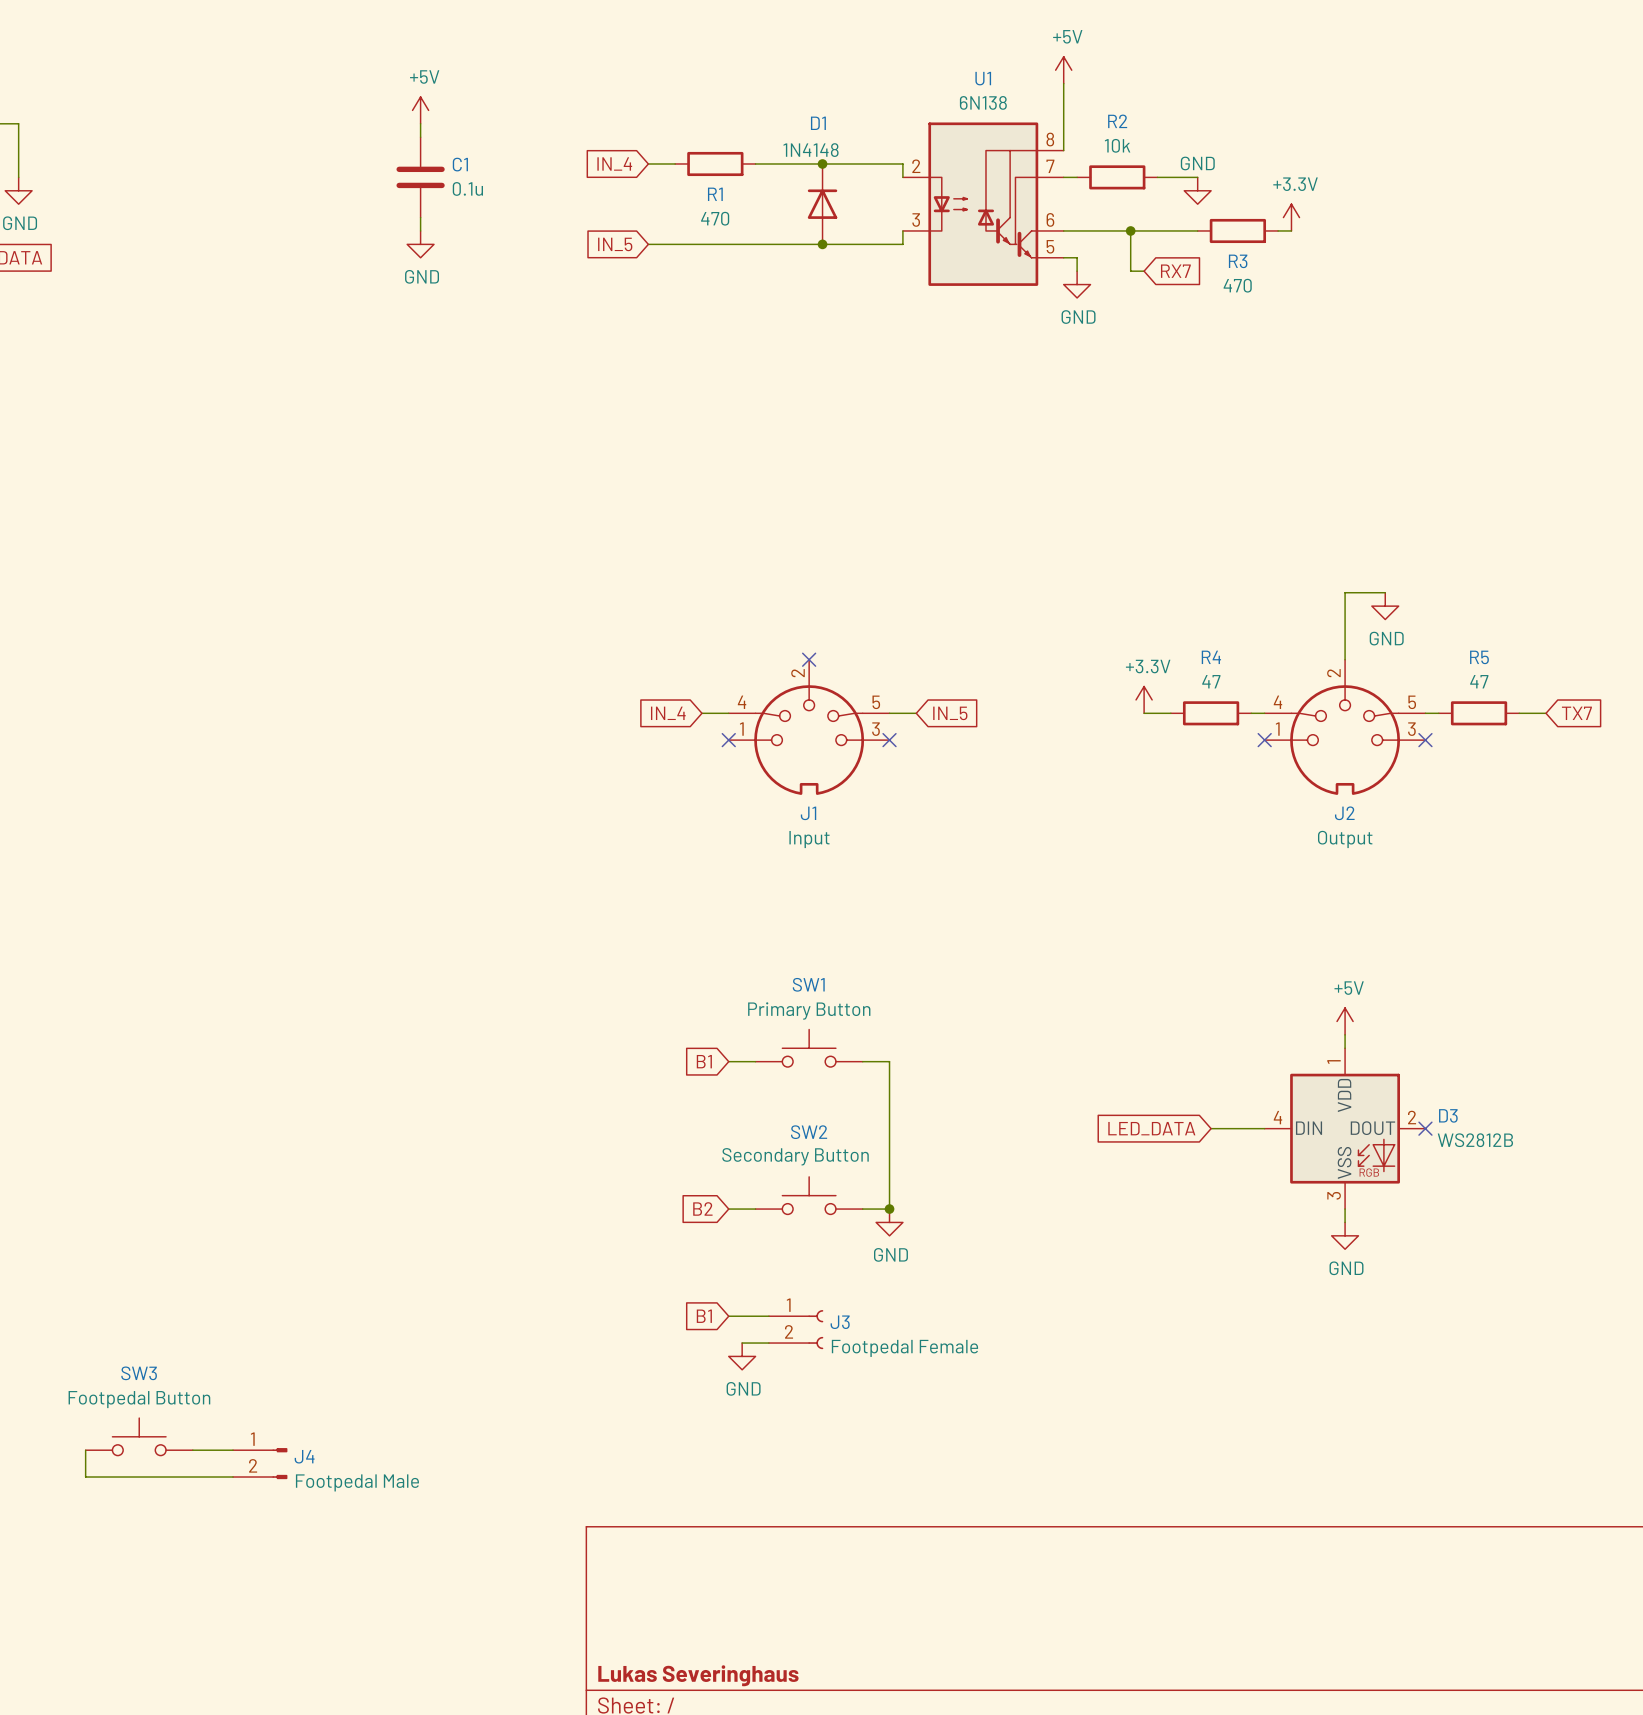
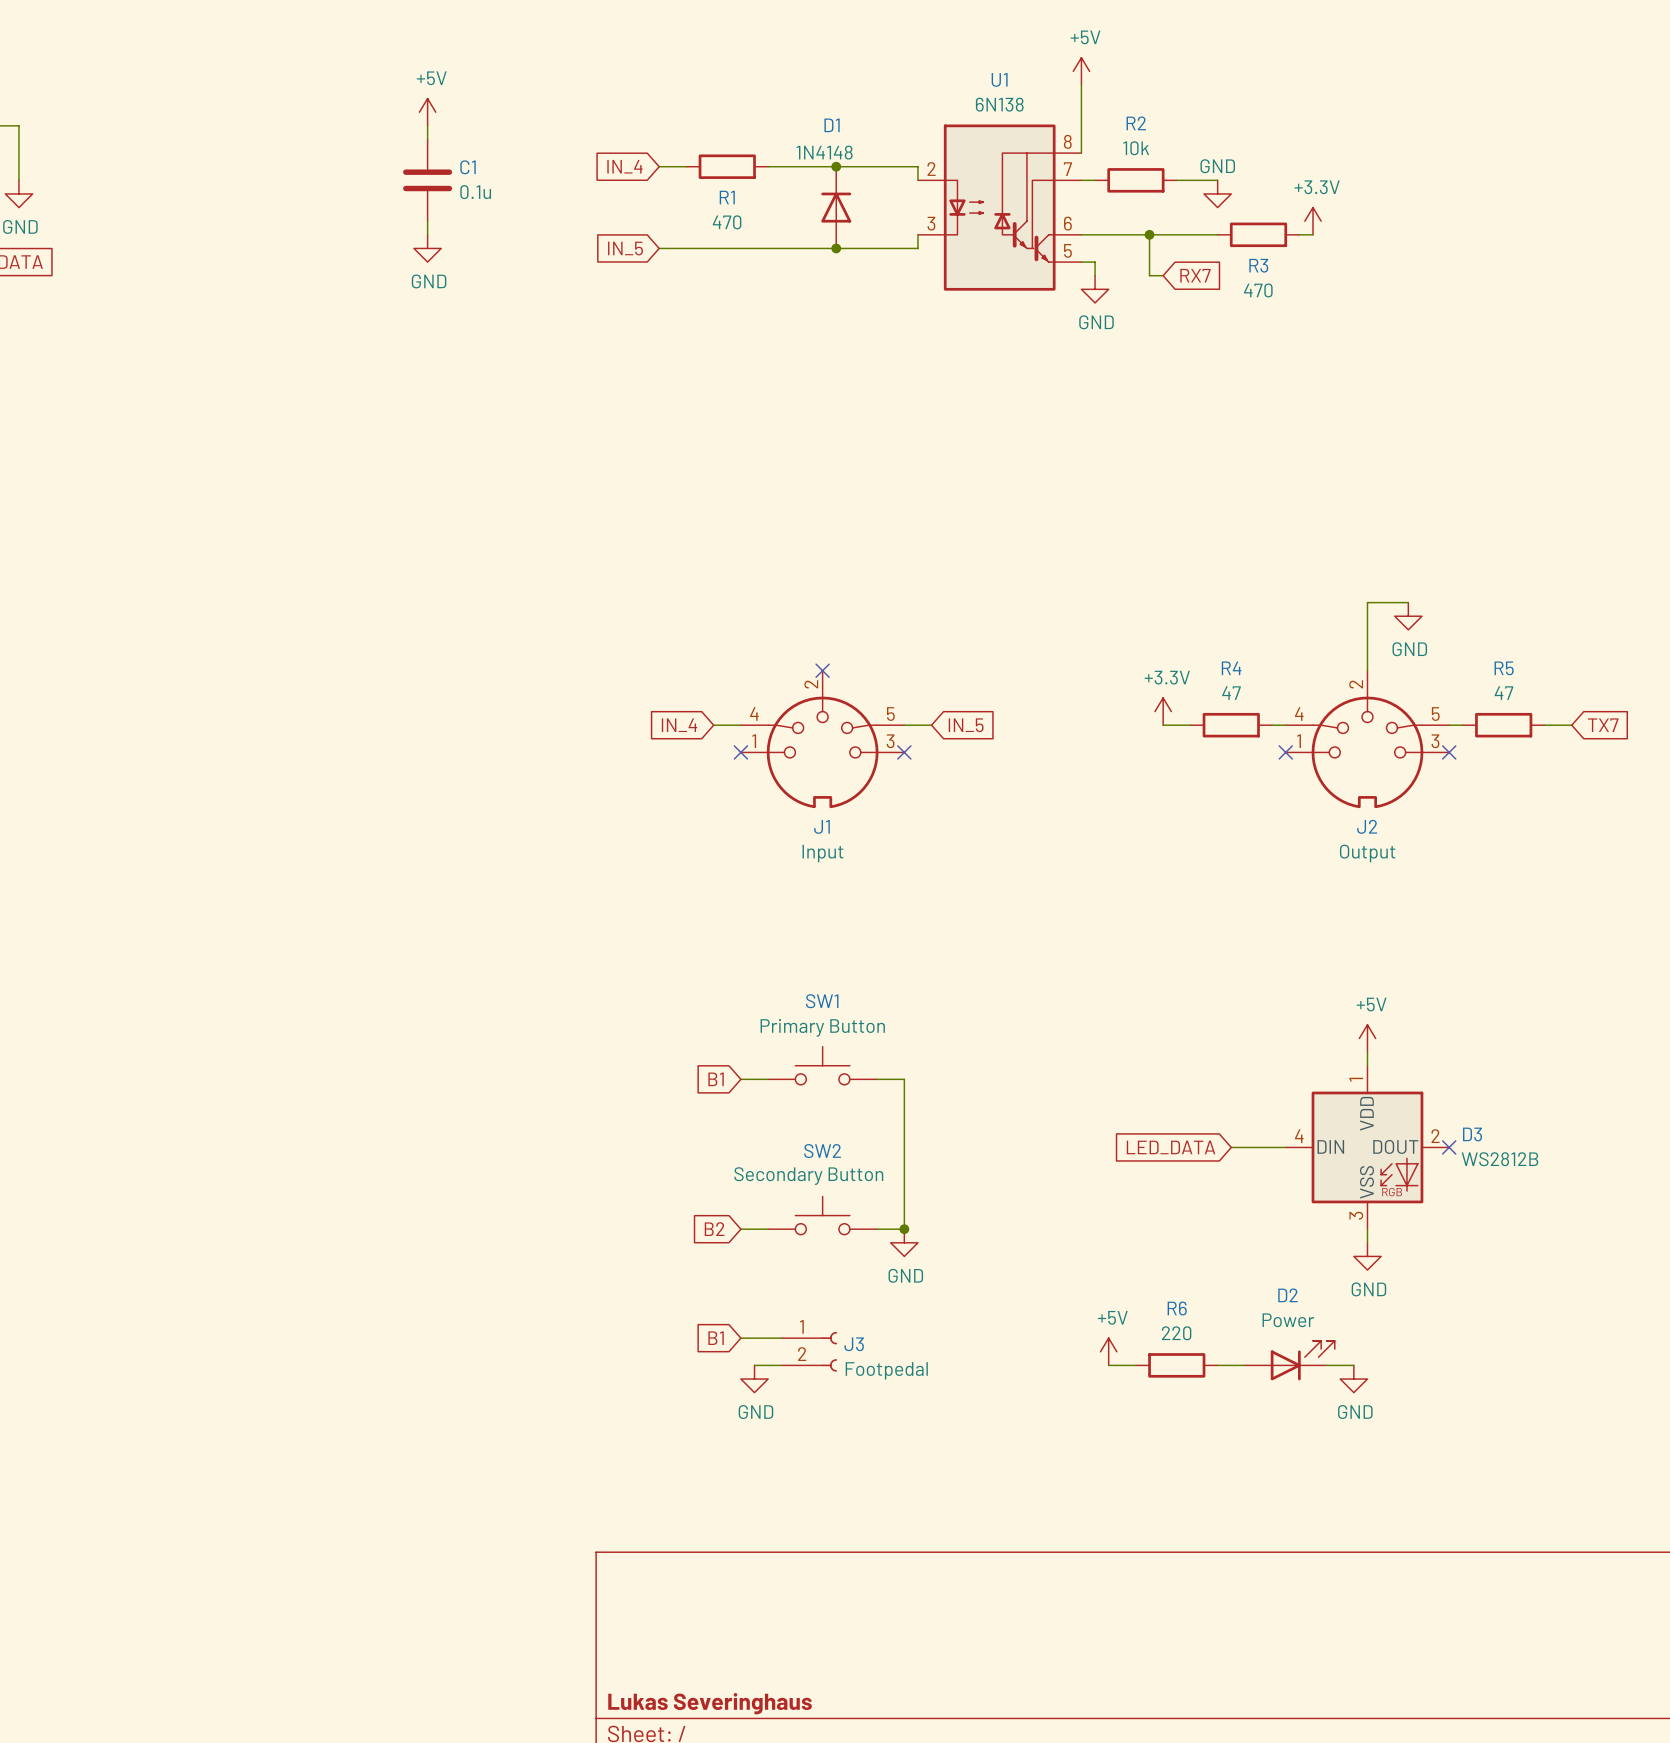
power symbol: none -> +5V (1108, 1351)
D2: none -> Power (1289, 1360)
wire: none -> (1108, 1365) (1135, 1365)
R6: none -> 220 (1176, 1365)
wire: none -> (1217, 1365) (1244, 1365)
wire: none -> (1326, 1365) (1353, 1365)
J3 value: Footpedal Female (904, 1348) -> Footpedal (886, 1370)
power symbol: none -> GND (1353, 1379)
SW3: Footpedal Button (139, 1436) -> none
wire: (85, 1450) (85, 1477) (233, 1477) -> none
wire: (192, 1450) (233, 1450) -> none
J4: Footpedal Male (260, 1463) -> none

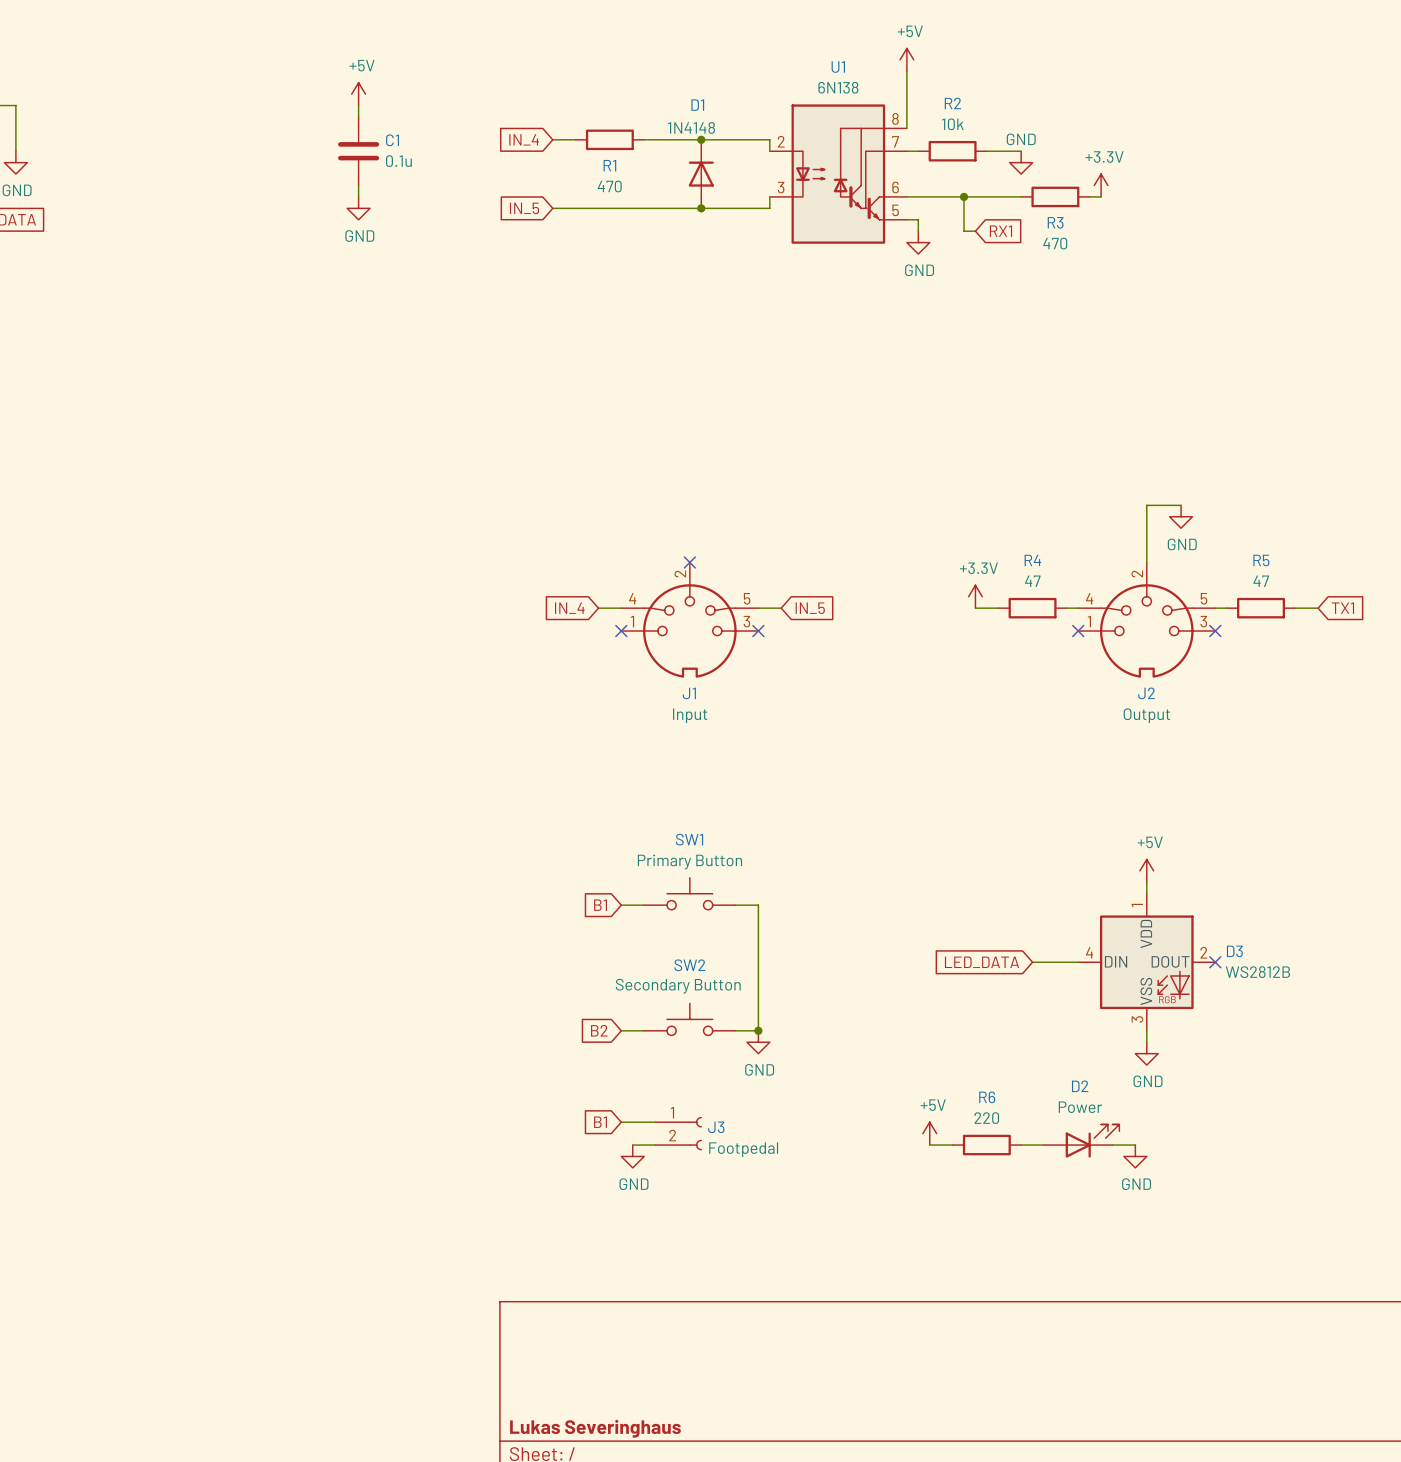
global label: RX7 (1195, 275) -> RX1 (1000, 231)
global label: TX7 (1603, 725) -> TX1 (1342, 608)

